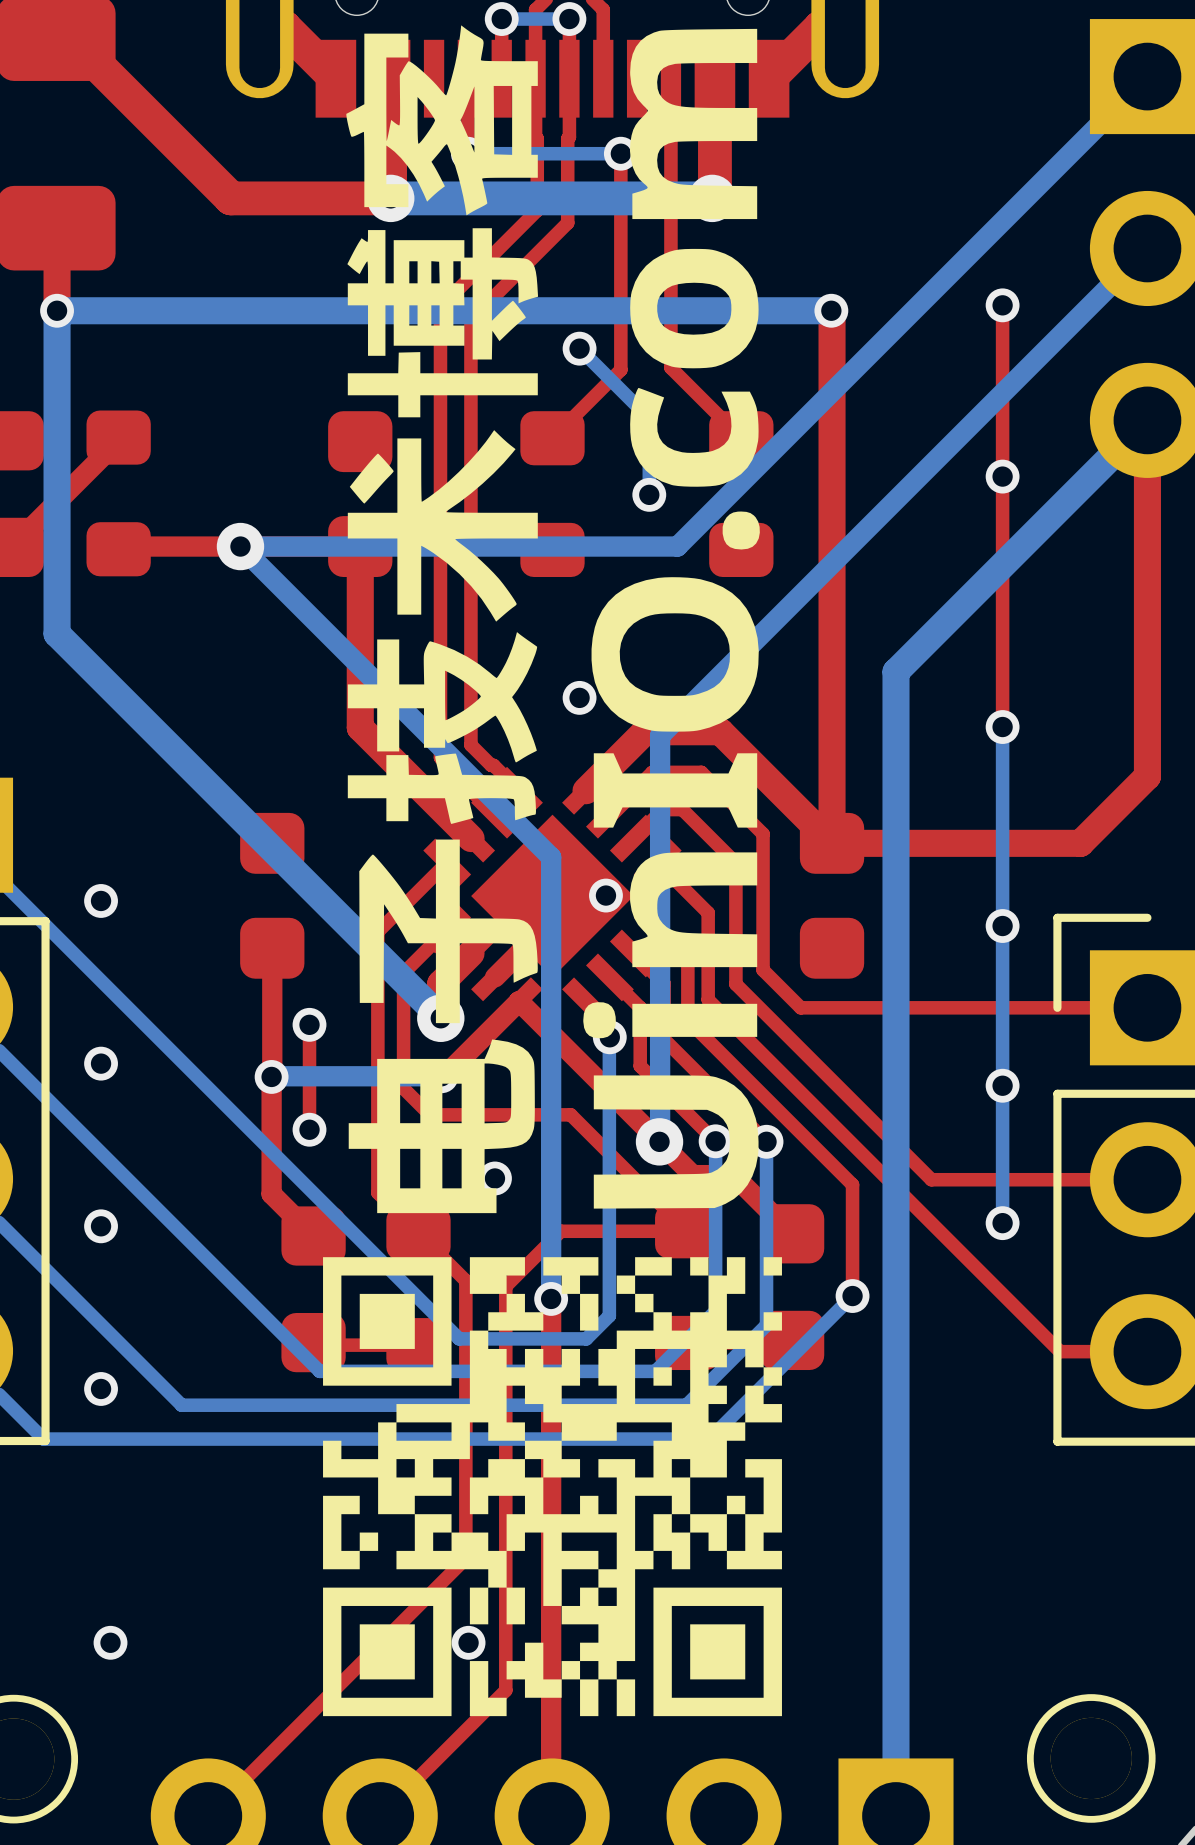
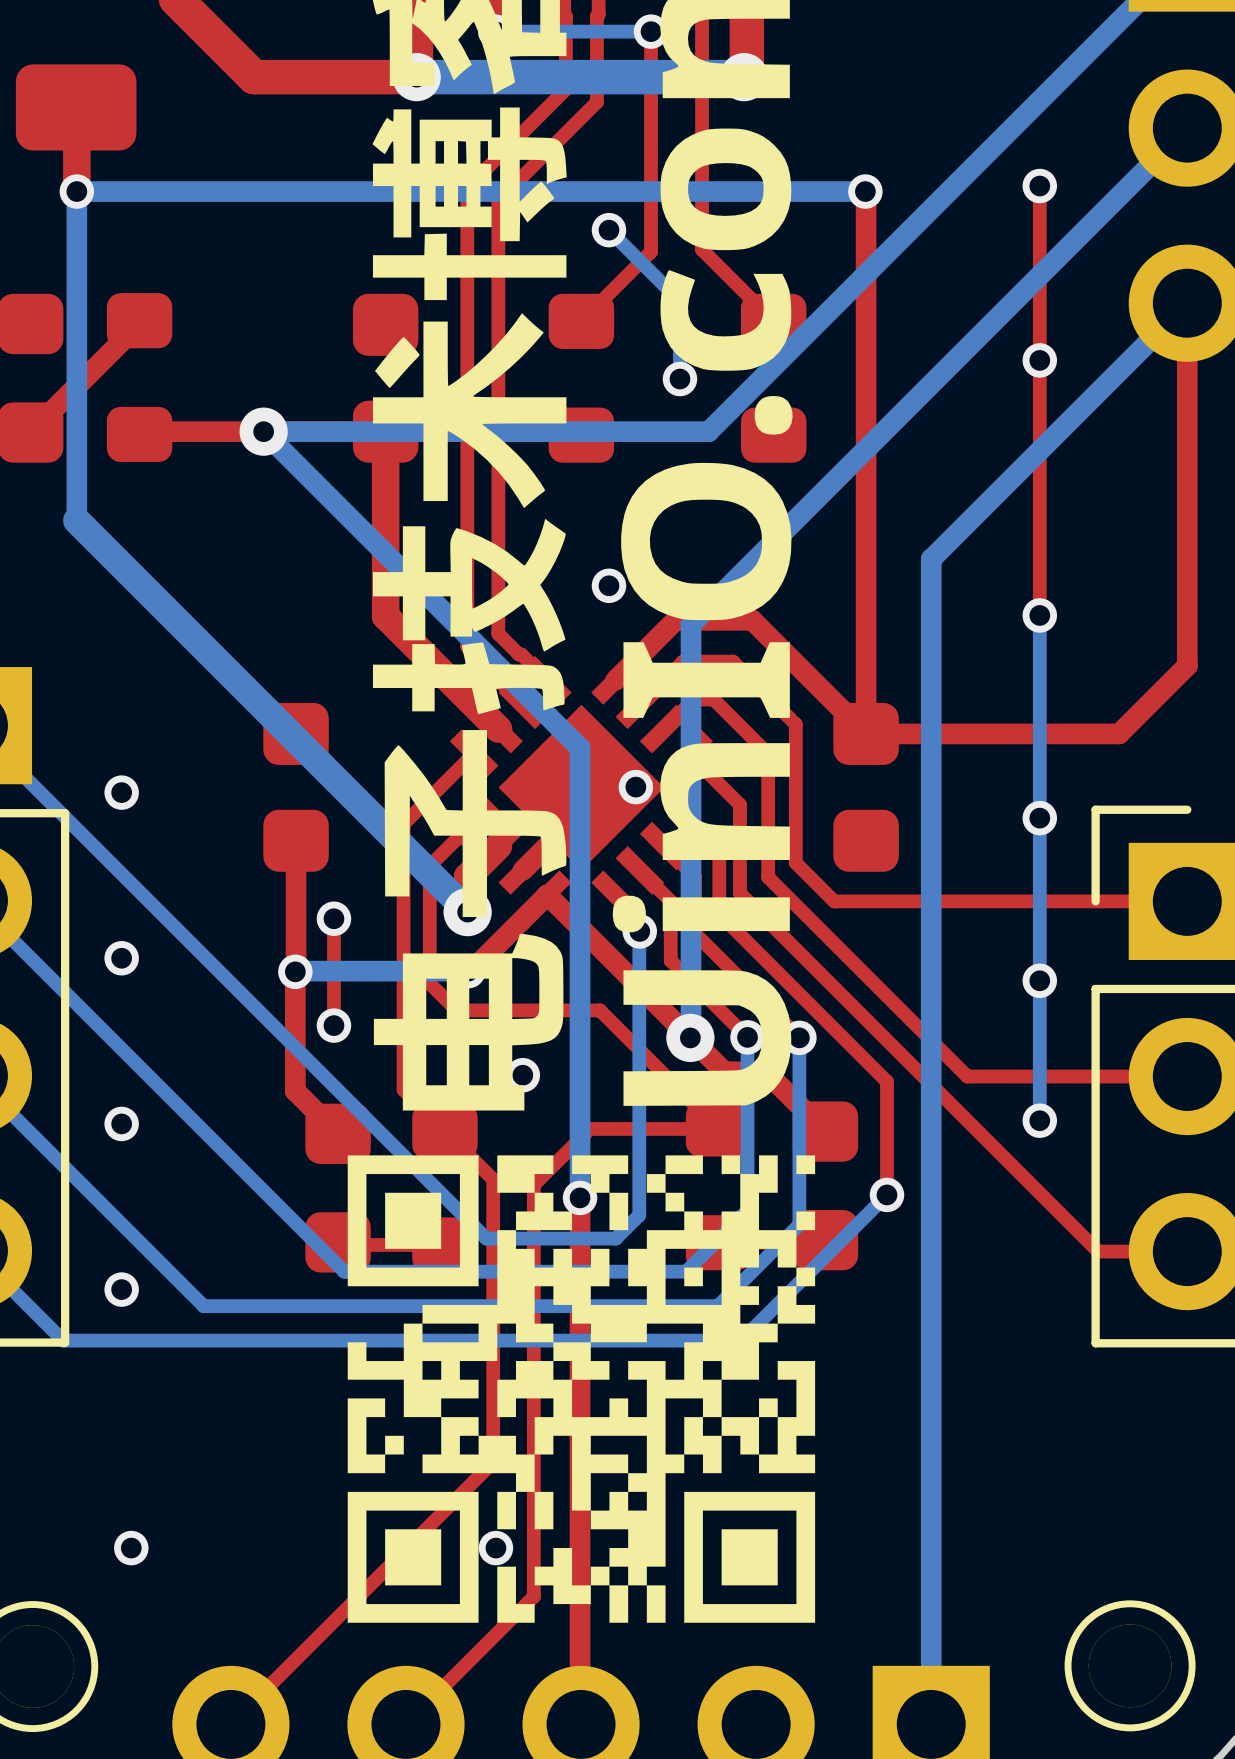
bottom track width: thick (831, 310) (57, 310) (57, 633) -> thin (865, 191) (76, 191) (76, 520)
top track width: thick (832, 311) (832, 843) -> thin (866, 192) (866, 733)
top track width: thick (1147, 420) (1147, 776) (1080, 843) (832, 843) -> thin (1187, 303) (1187, 665) (1119, 733) (866, 733)
bottom track width: thick (1147, 420) (896, 671) (896, 1815) -> thin (1187, 303) (931, 559) (931, 1724)
top track width: thick (586, 790) (644, 731) (720, 731) (832, 843) -> thin (615, 680) (675, 620) (752, 620) (866, 733)

